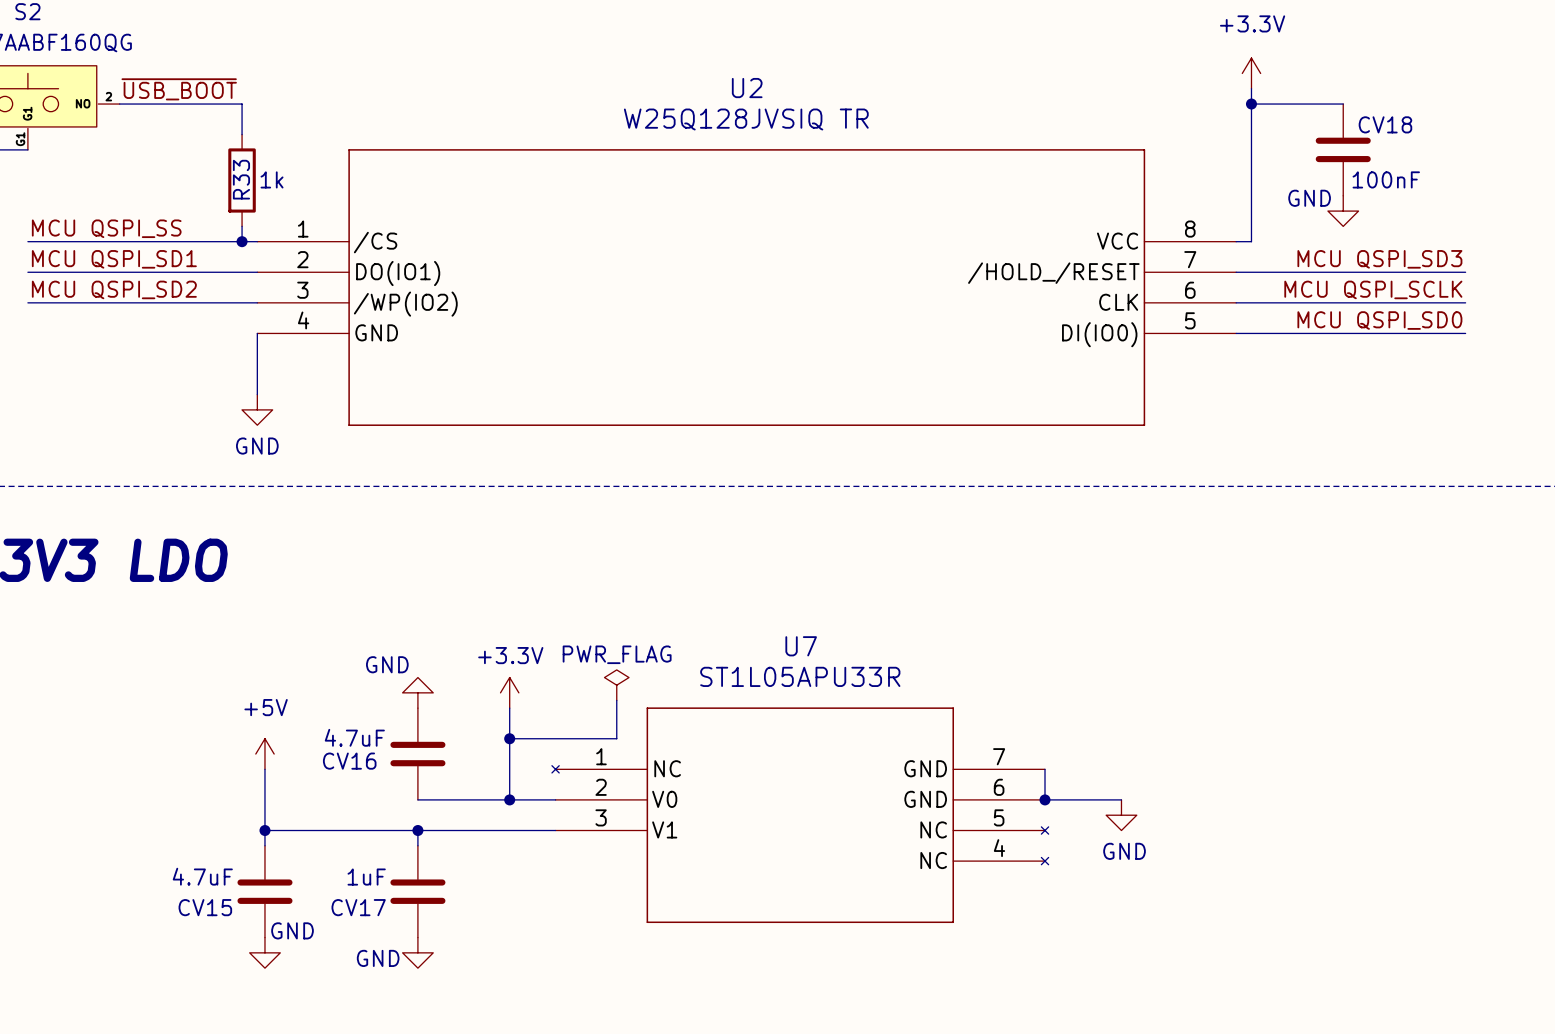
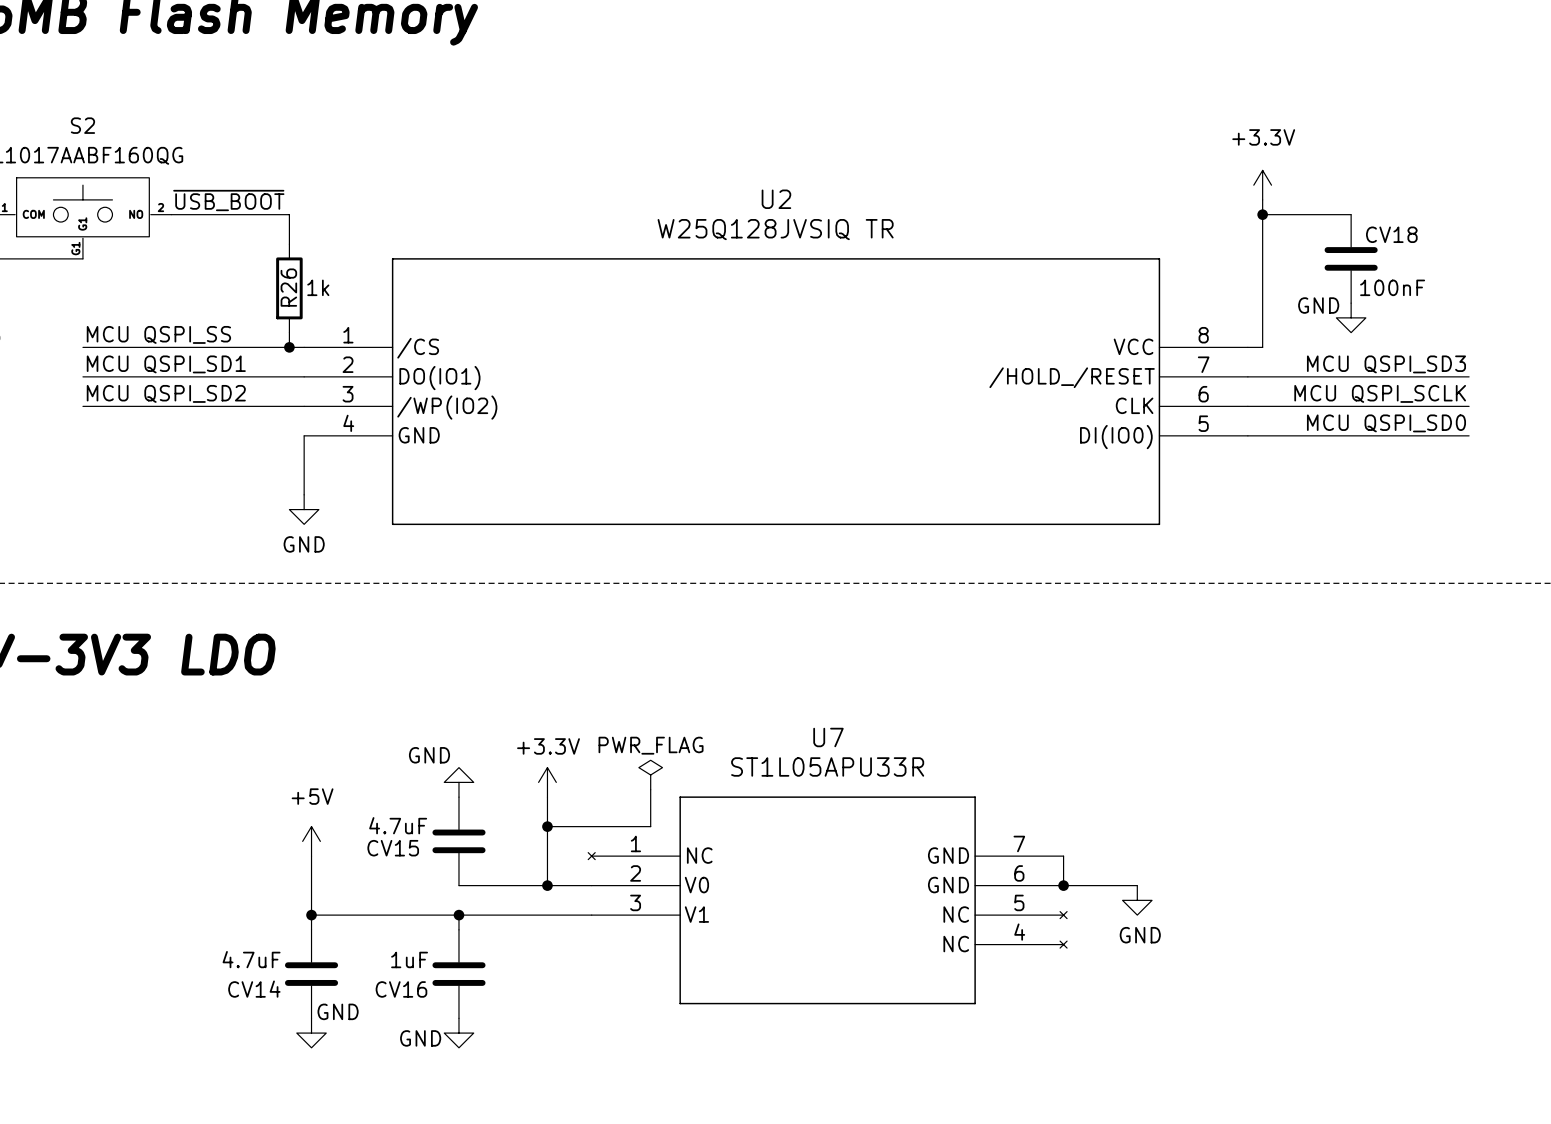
R33 name: R33 (241, 179) -> R26 (288, 287)
CV16 name: CV16 (349, 761) -> CV15 (393, 848)
CV15 name: CV15 (205, 907) -> CV14 (254, 989)
CV17 name: CV17 (358, 907) -> CV16 (401, 989)

